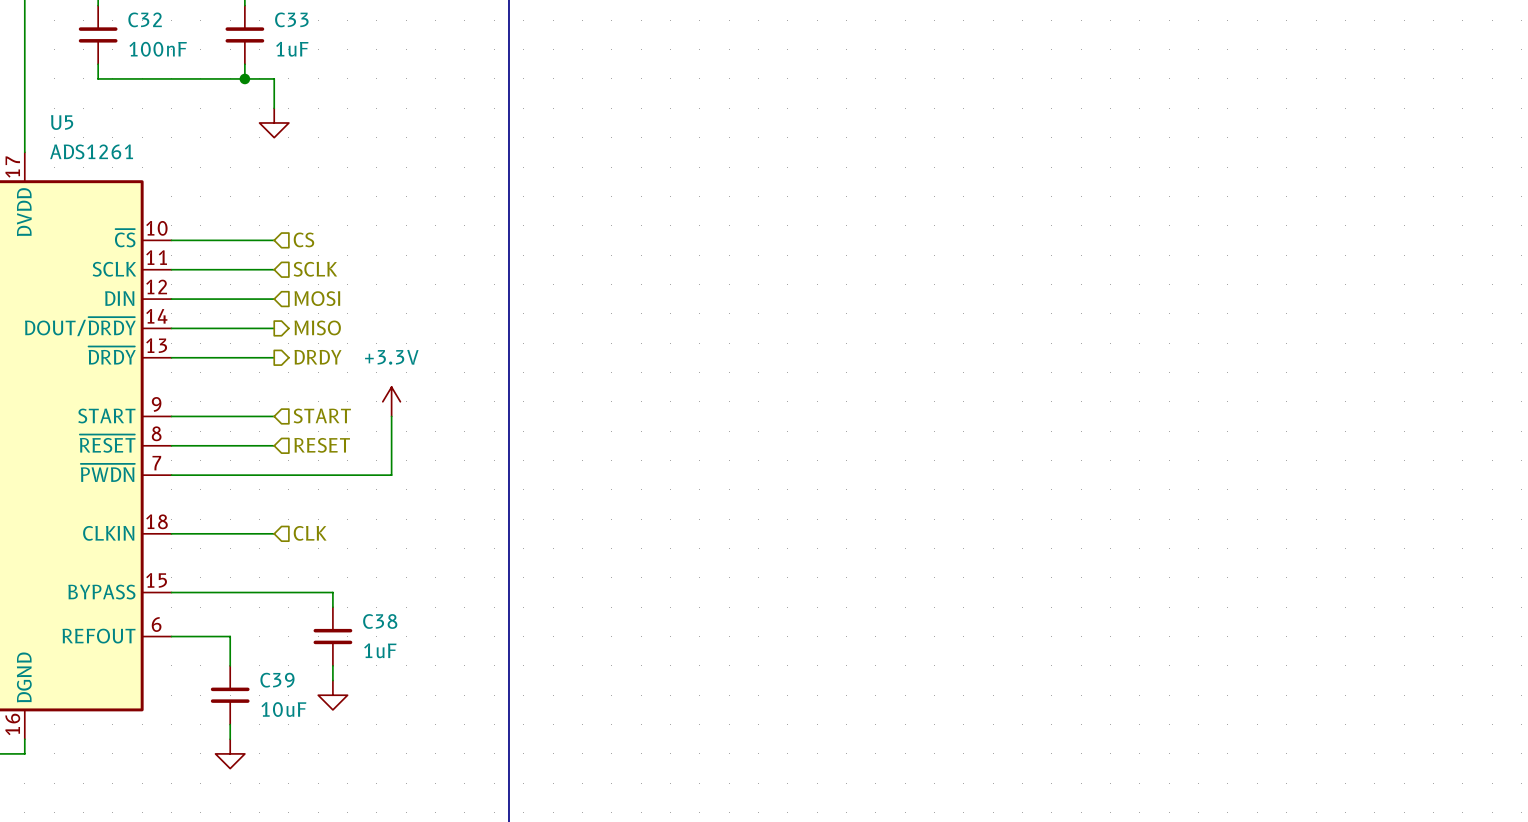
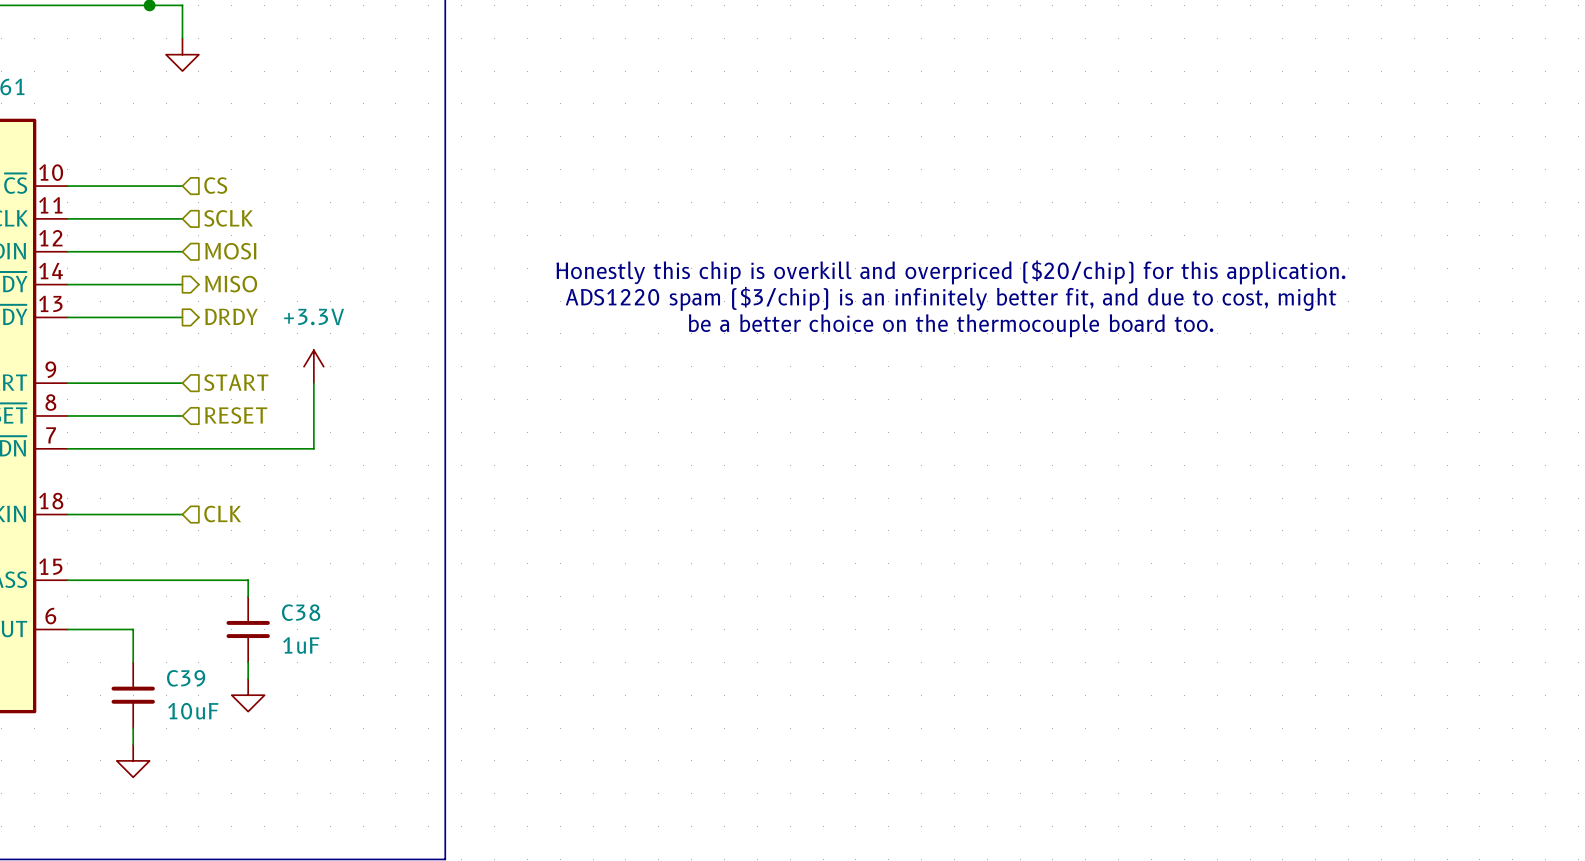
text: none -> Honestly this chip is overkill and overpriced ($20/chip) for this application. (950, 272)
text: none -> ADS1220 spam ($3/chip) is an infinitely better fit, and due to cost, might (951, 298)
text: none -> be a better choice on the thermocouple board too. (951, 325)

